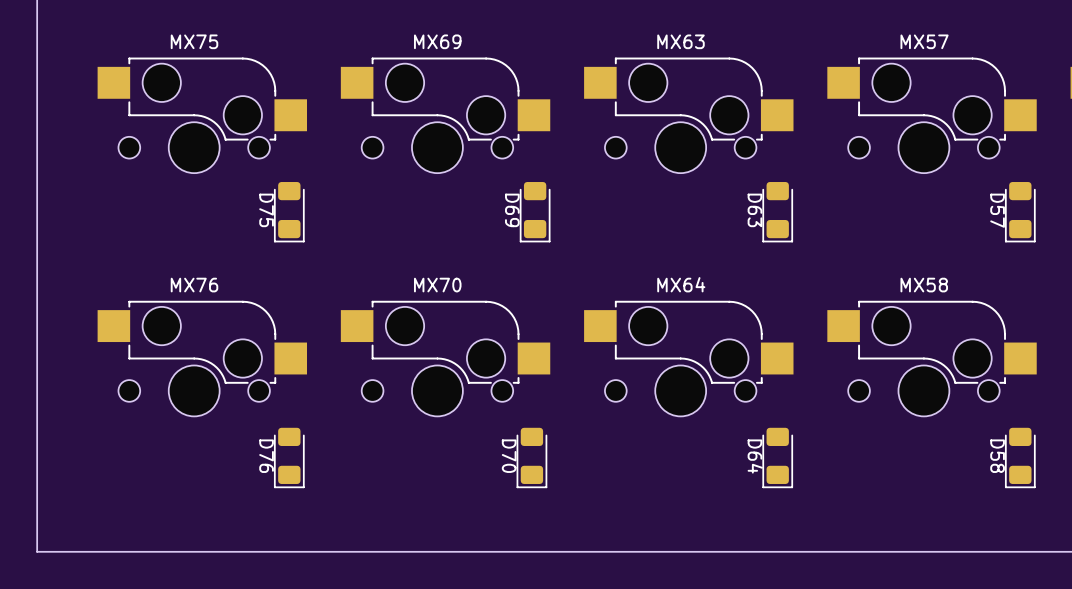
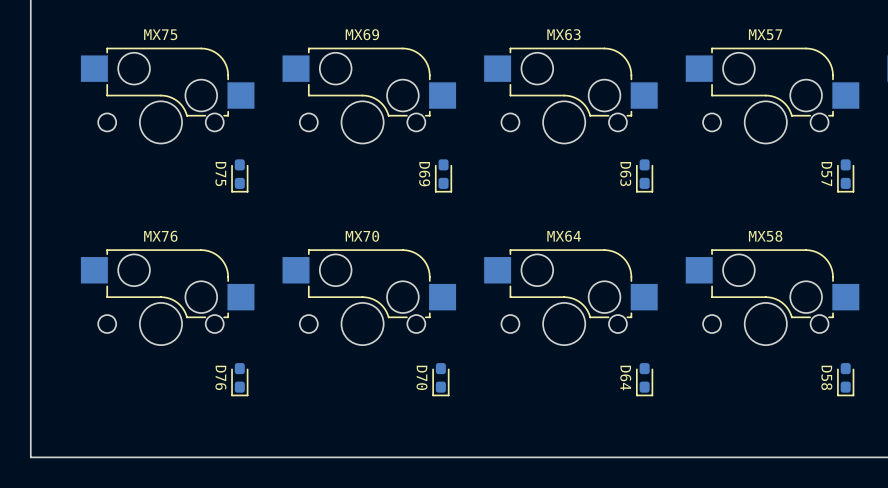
D75 footprint: [274, 182, 305, 243] -> [231, 159, 249, 193]
D69 footprint: [519, 182, 551, 243] -> [435, 159, 452, 193]
D63 footprint: [762, 182, 793, 243] -> [636, 159, 654, 193]
D57 footprint: [1005, 182, 1036, 243] -> [837, 159, 855, 193]
D76 footprint: [274, 427, 305, 489] -> [231, 363, 249, 397]
D70 footprint: [516, 427, 548, 489] -> [432, 363, 450, 397]
D64 footprint: [762, 427, 793, 489] -> [636, 363, 654, 397]
D58 footprint: [1005, 427, 1036, 489] -> [837, 363, 855, 397]

